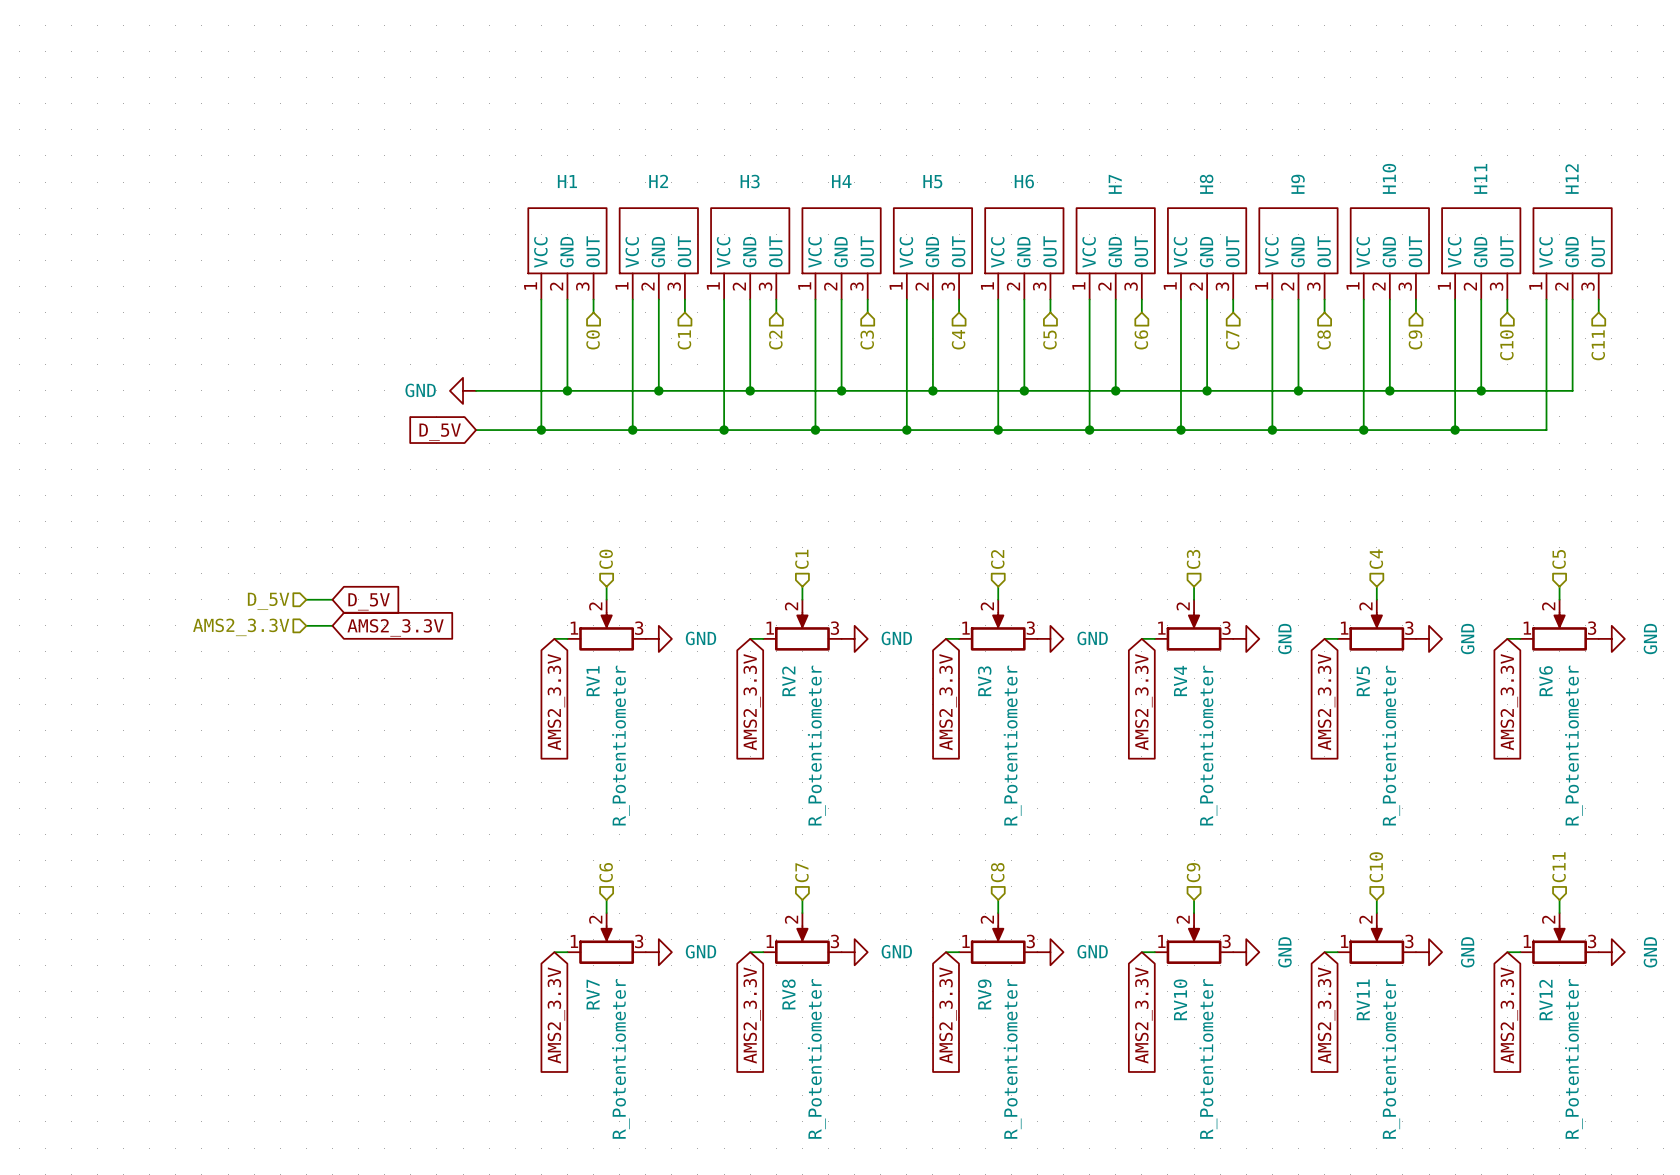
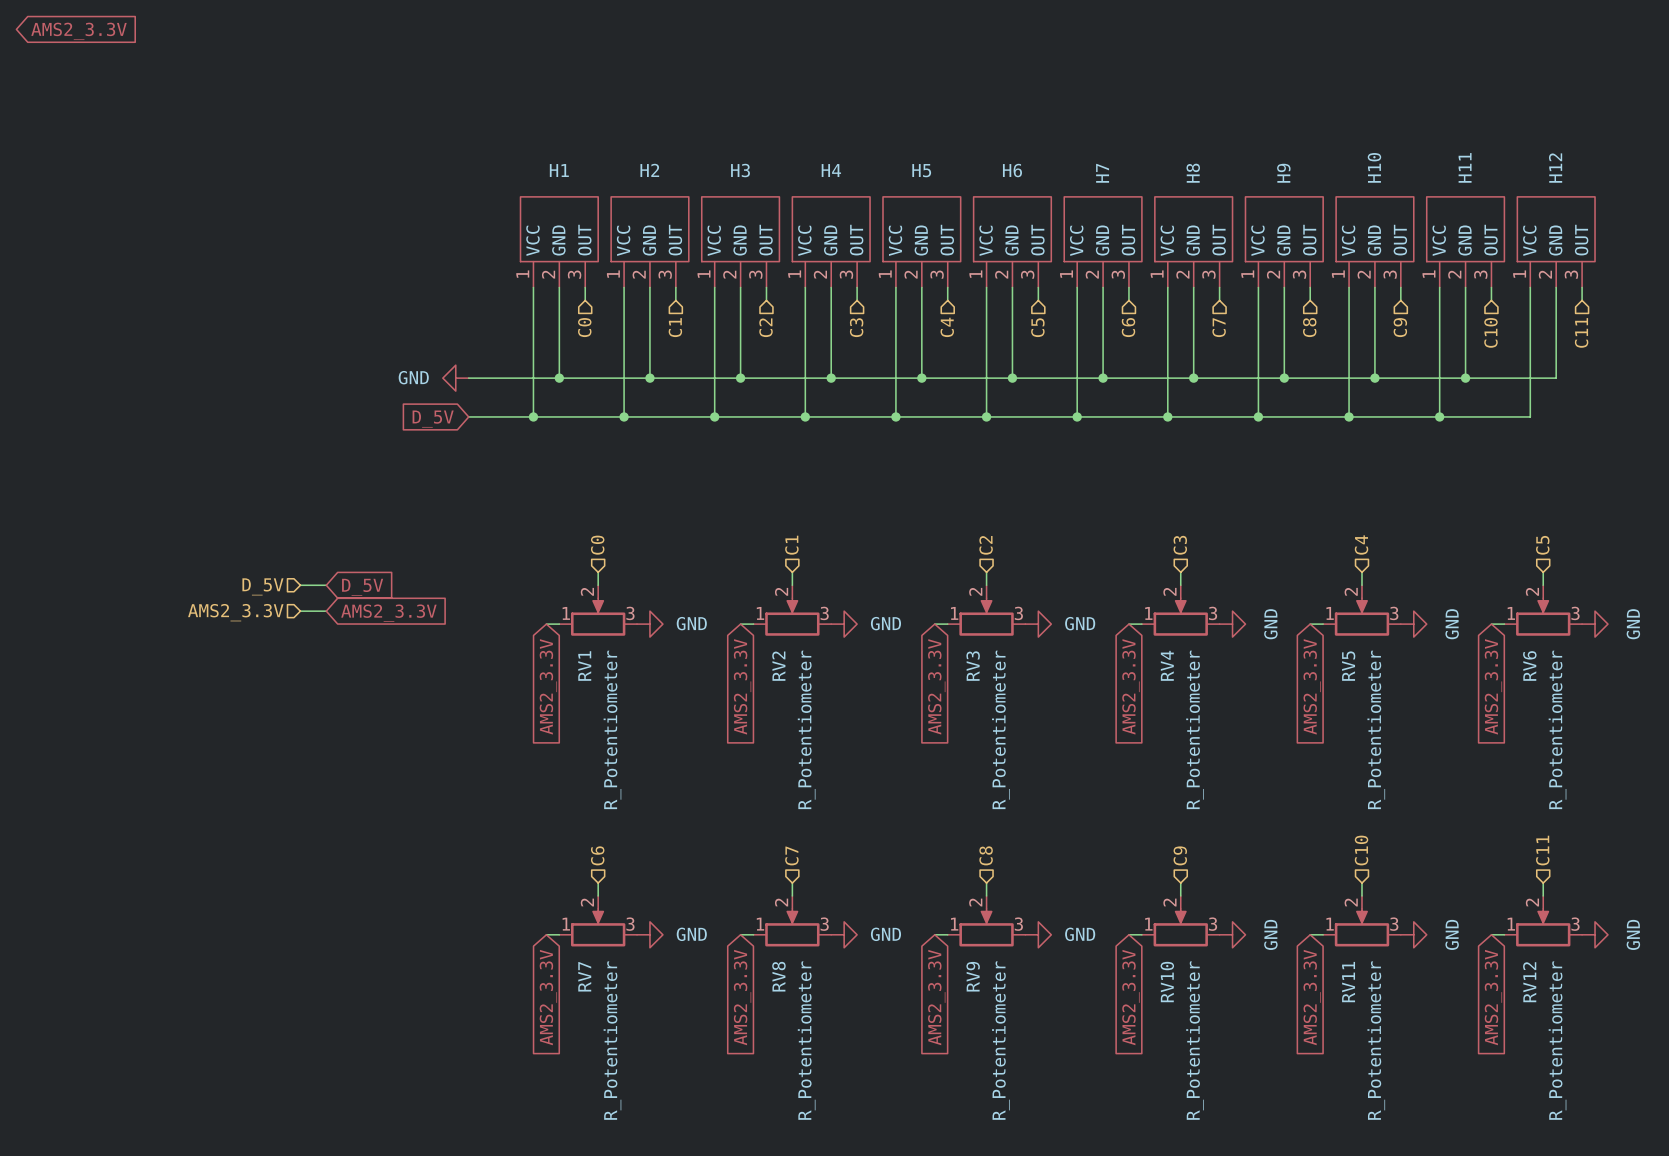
global label: none -> AMS2_3.3V (79, 31)

